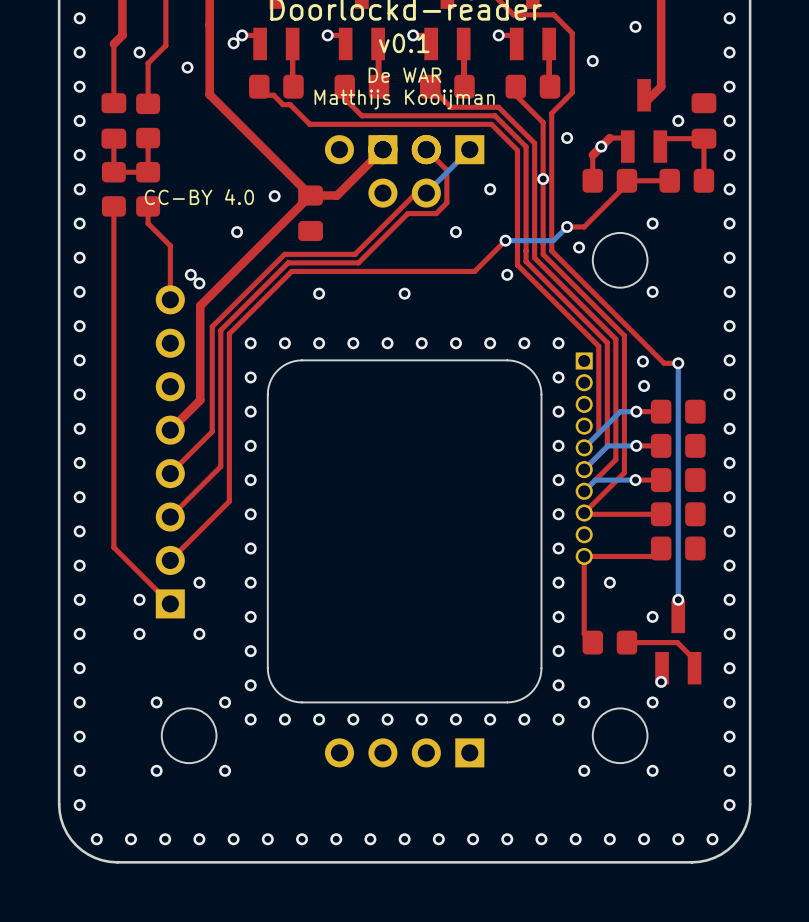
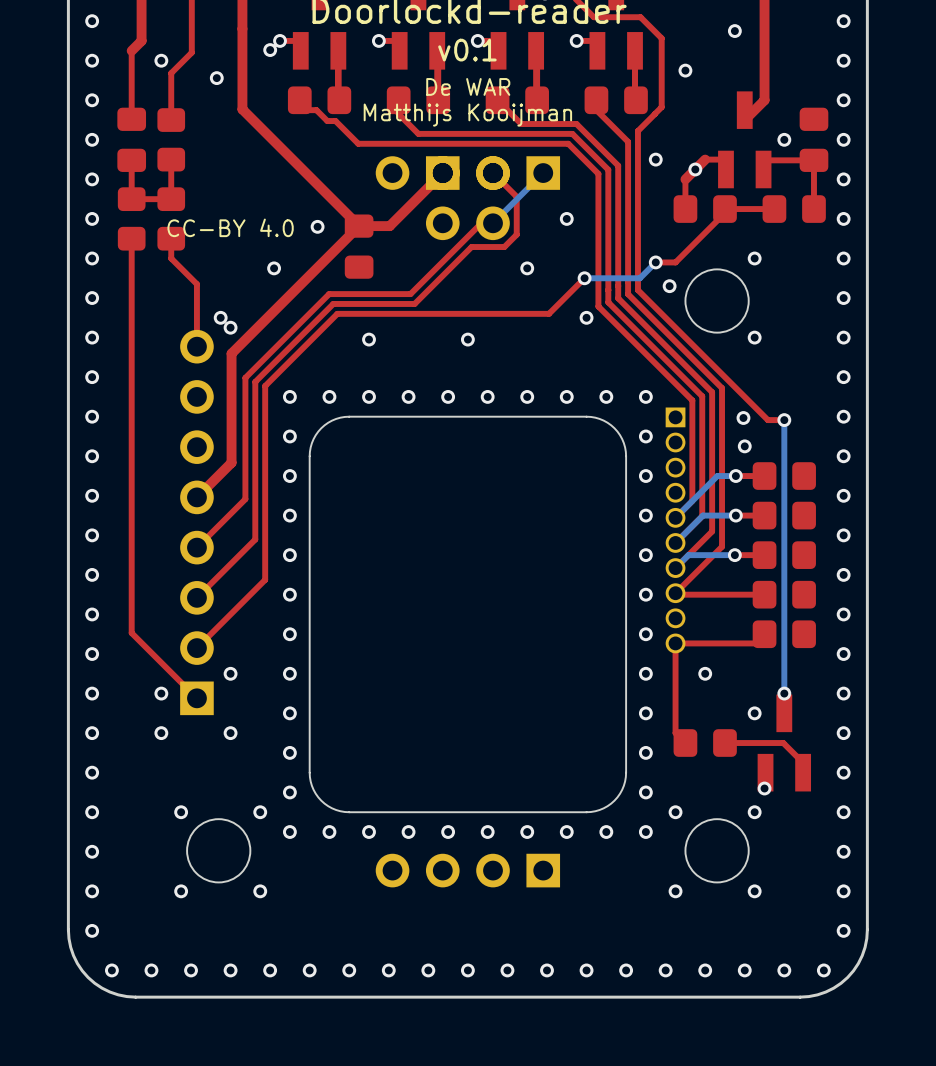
via: (543, 179) -> none

